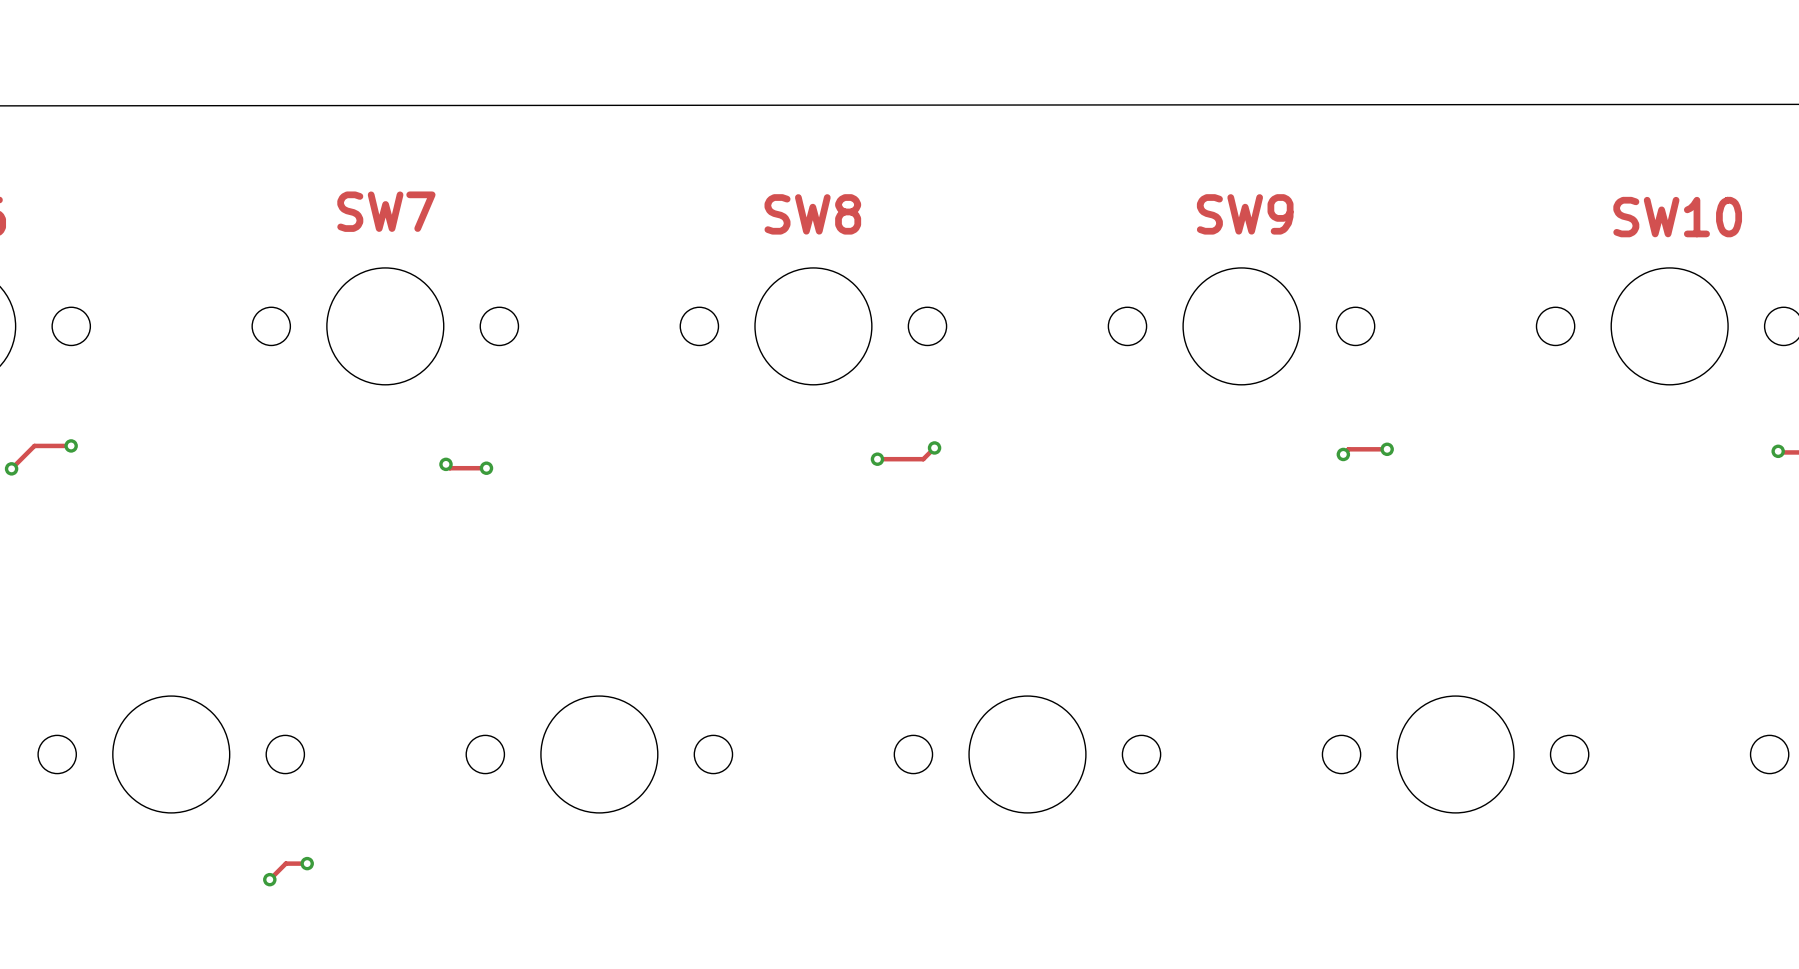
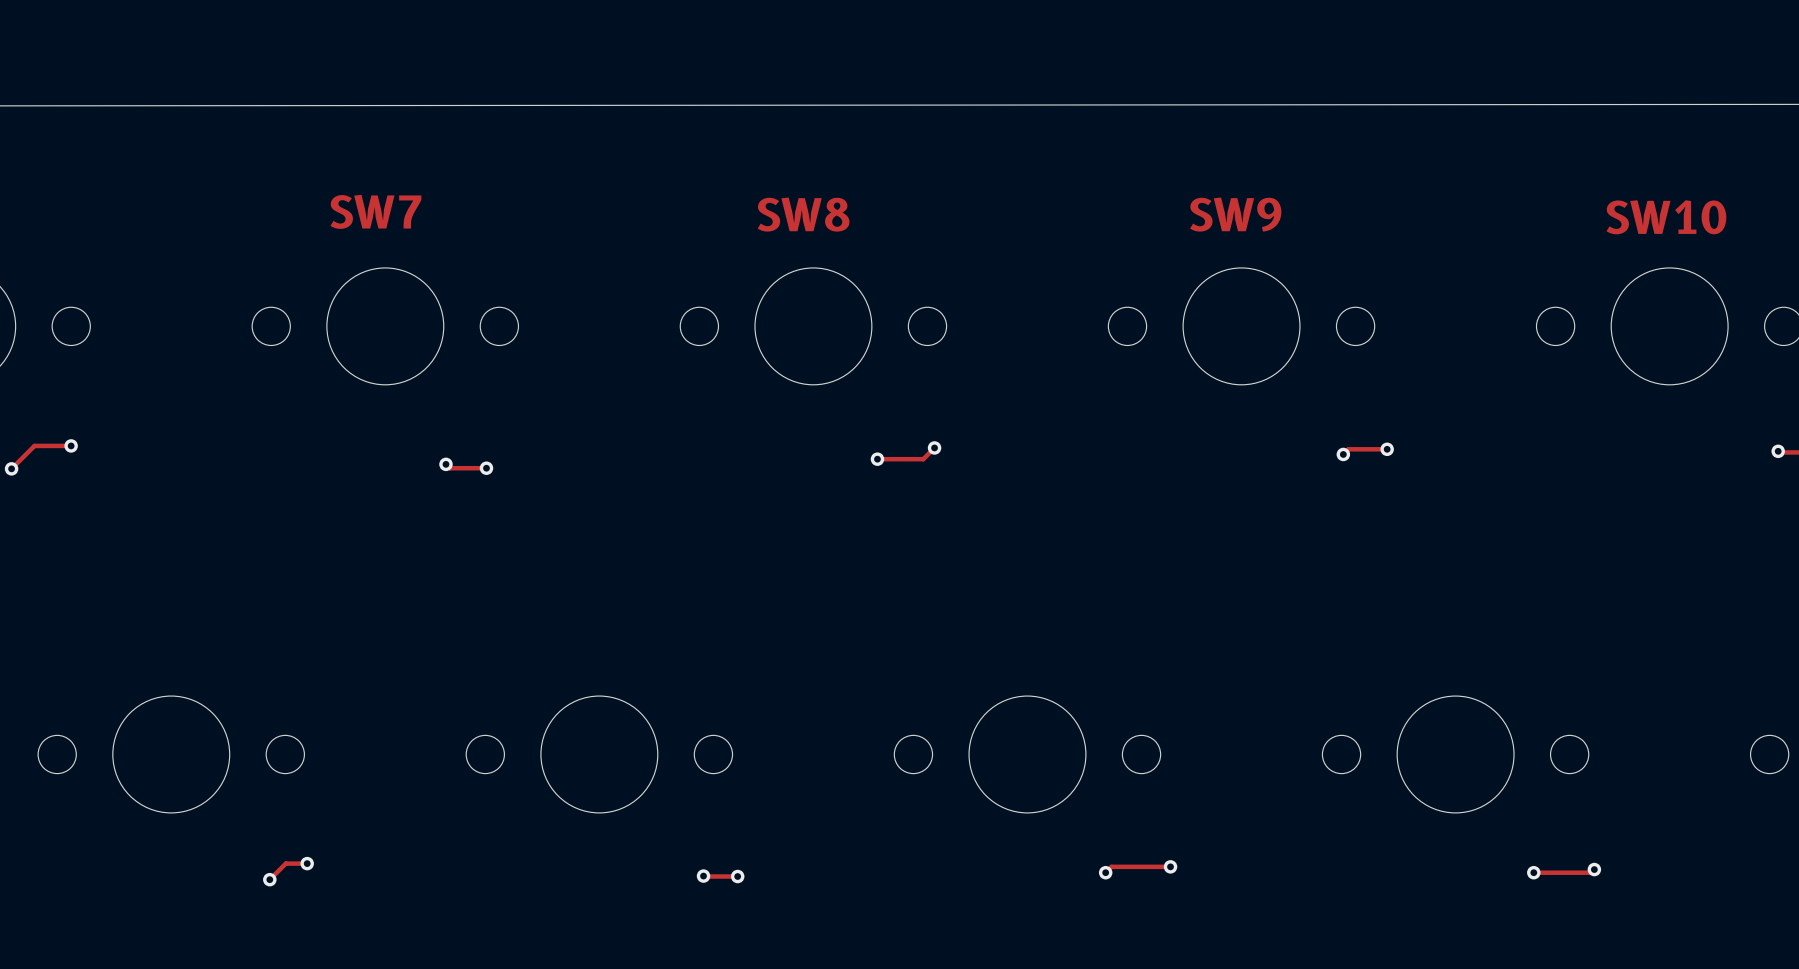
track: none -> (1170, 866) (1111, 866) (1105, 872)
via: none -> (1170, 866)
track: none -> (1594, 869) (1591, 872) (1533, 872)
via: none -> (1594, 869)
via: none -> (1105, 872)
via: none -> (1533, 872)
track: none -> (703, 876) (737, 876)
via: none -> (703, 876)
via: none -> (737, 876)

